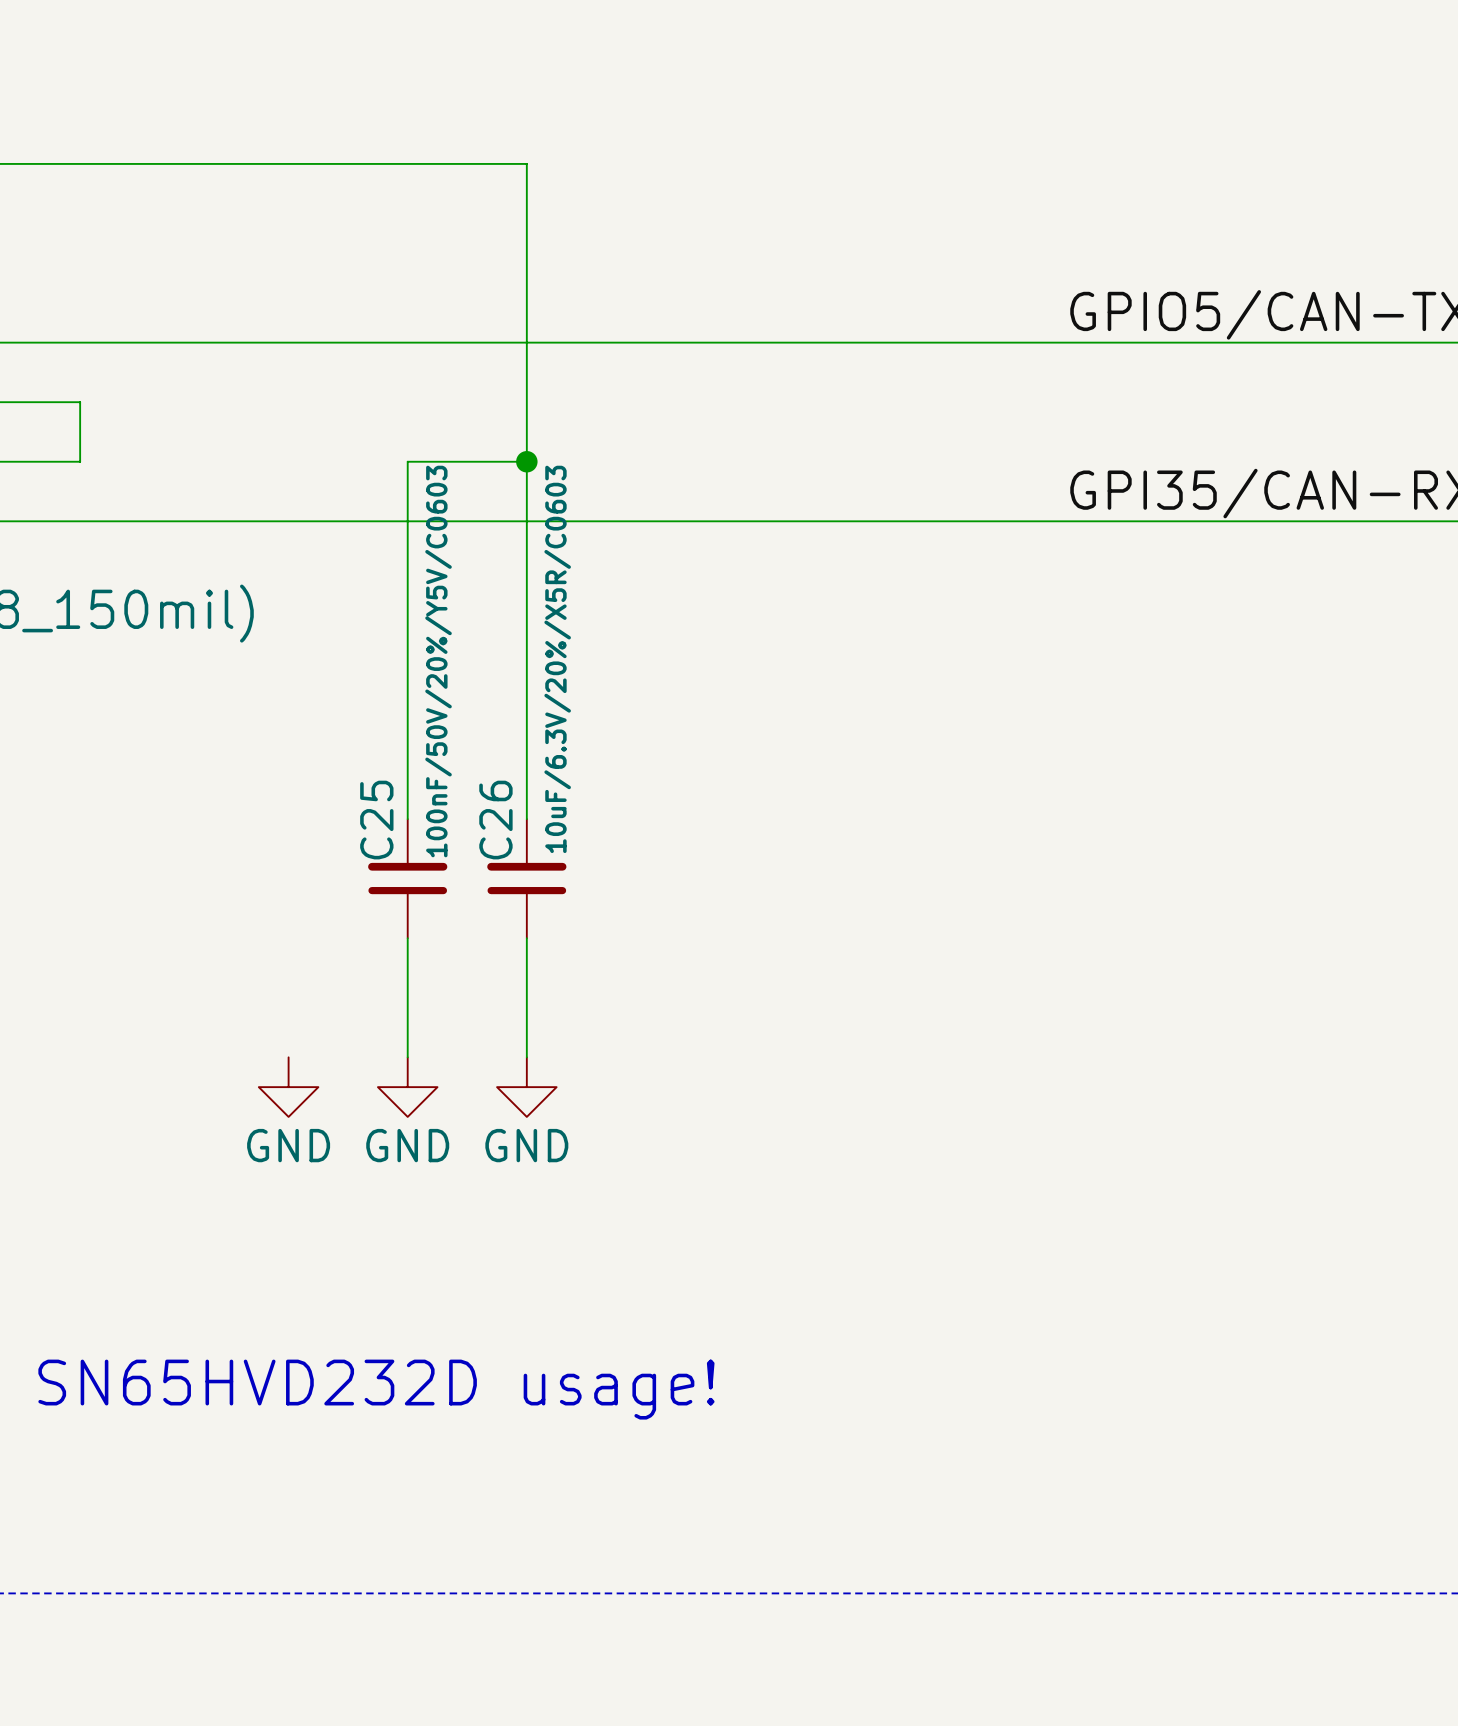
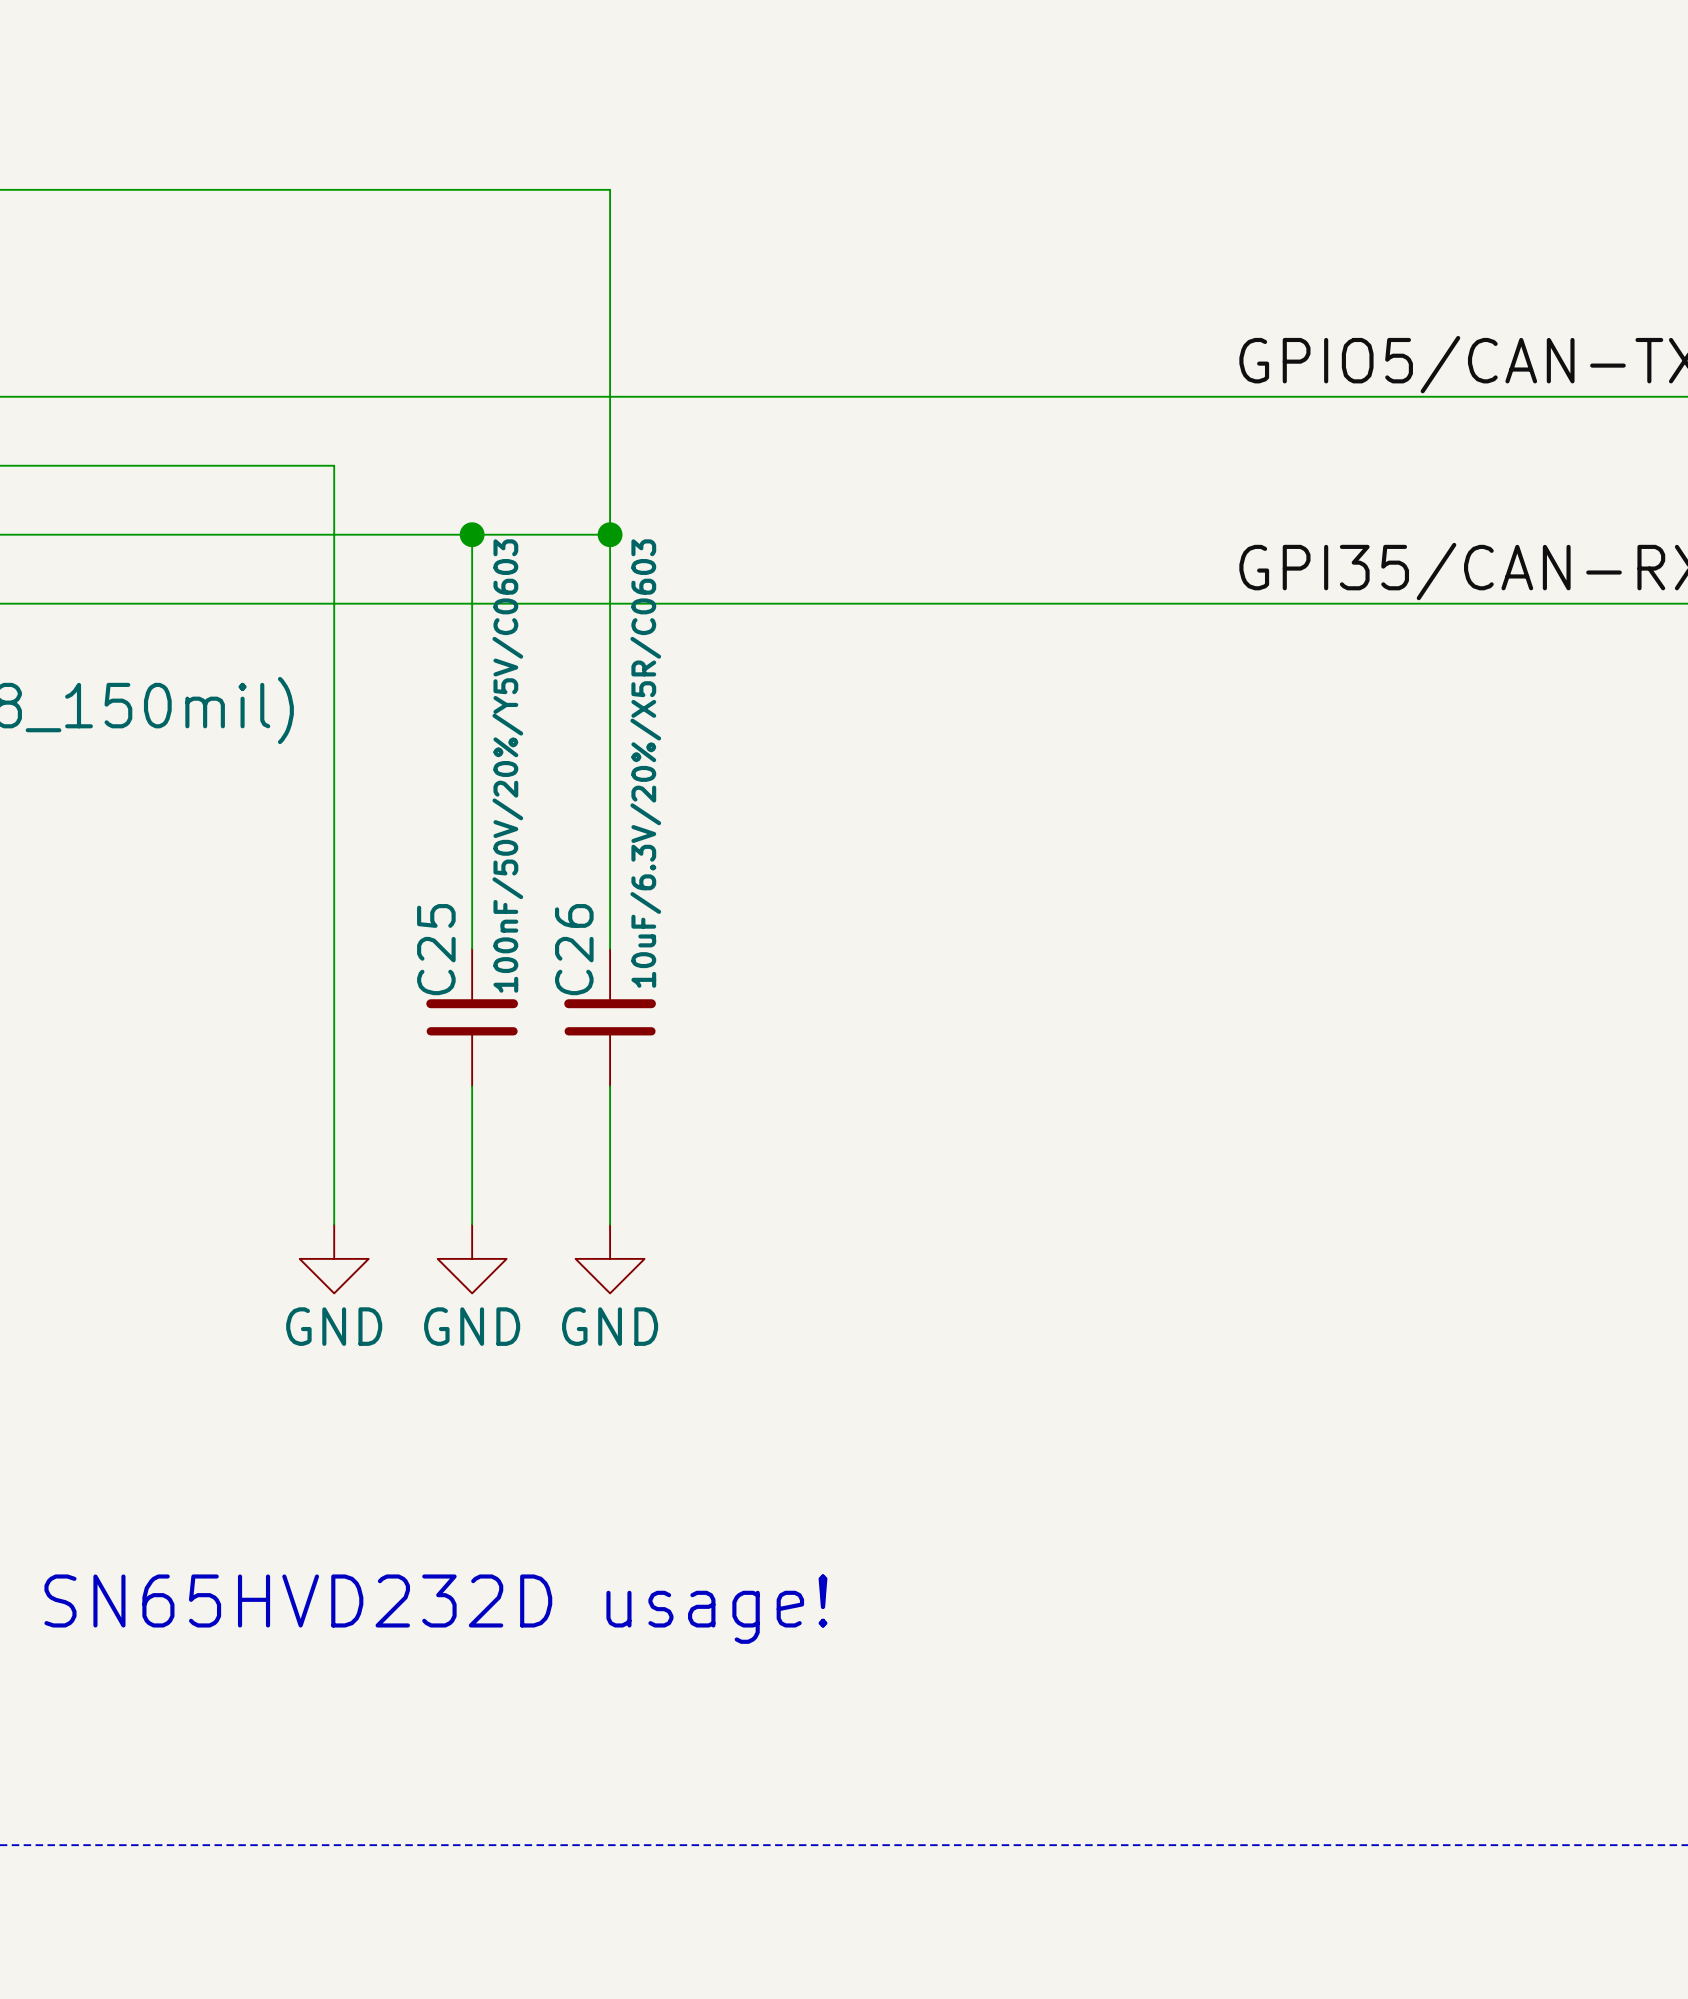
wire: (80, 402) (80, 461) -> (472, 534) (92, 534)
wire: none -> (92, 465) (334, 465) (334, 1224)
junction: none -> (472, 534)

